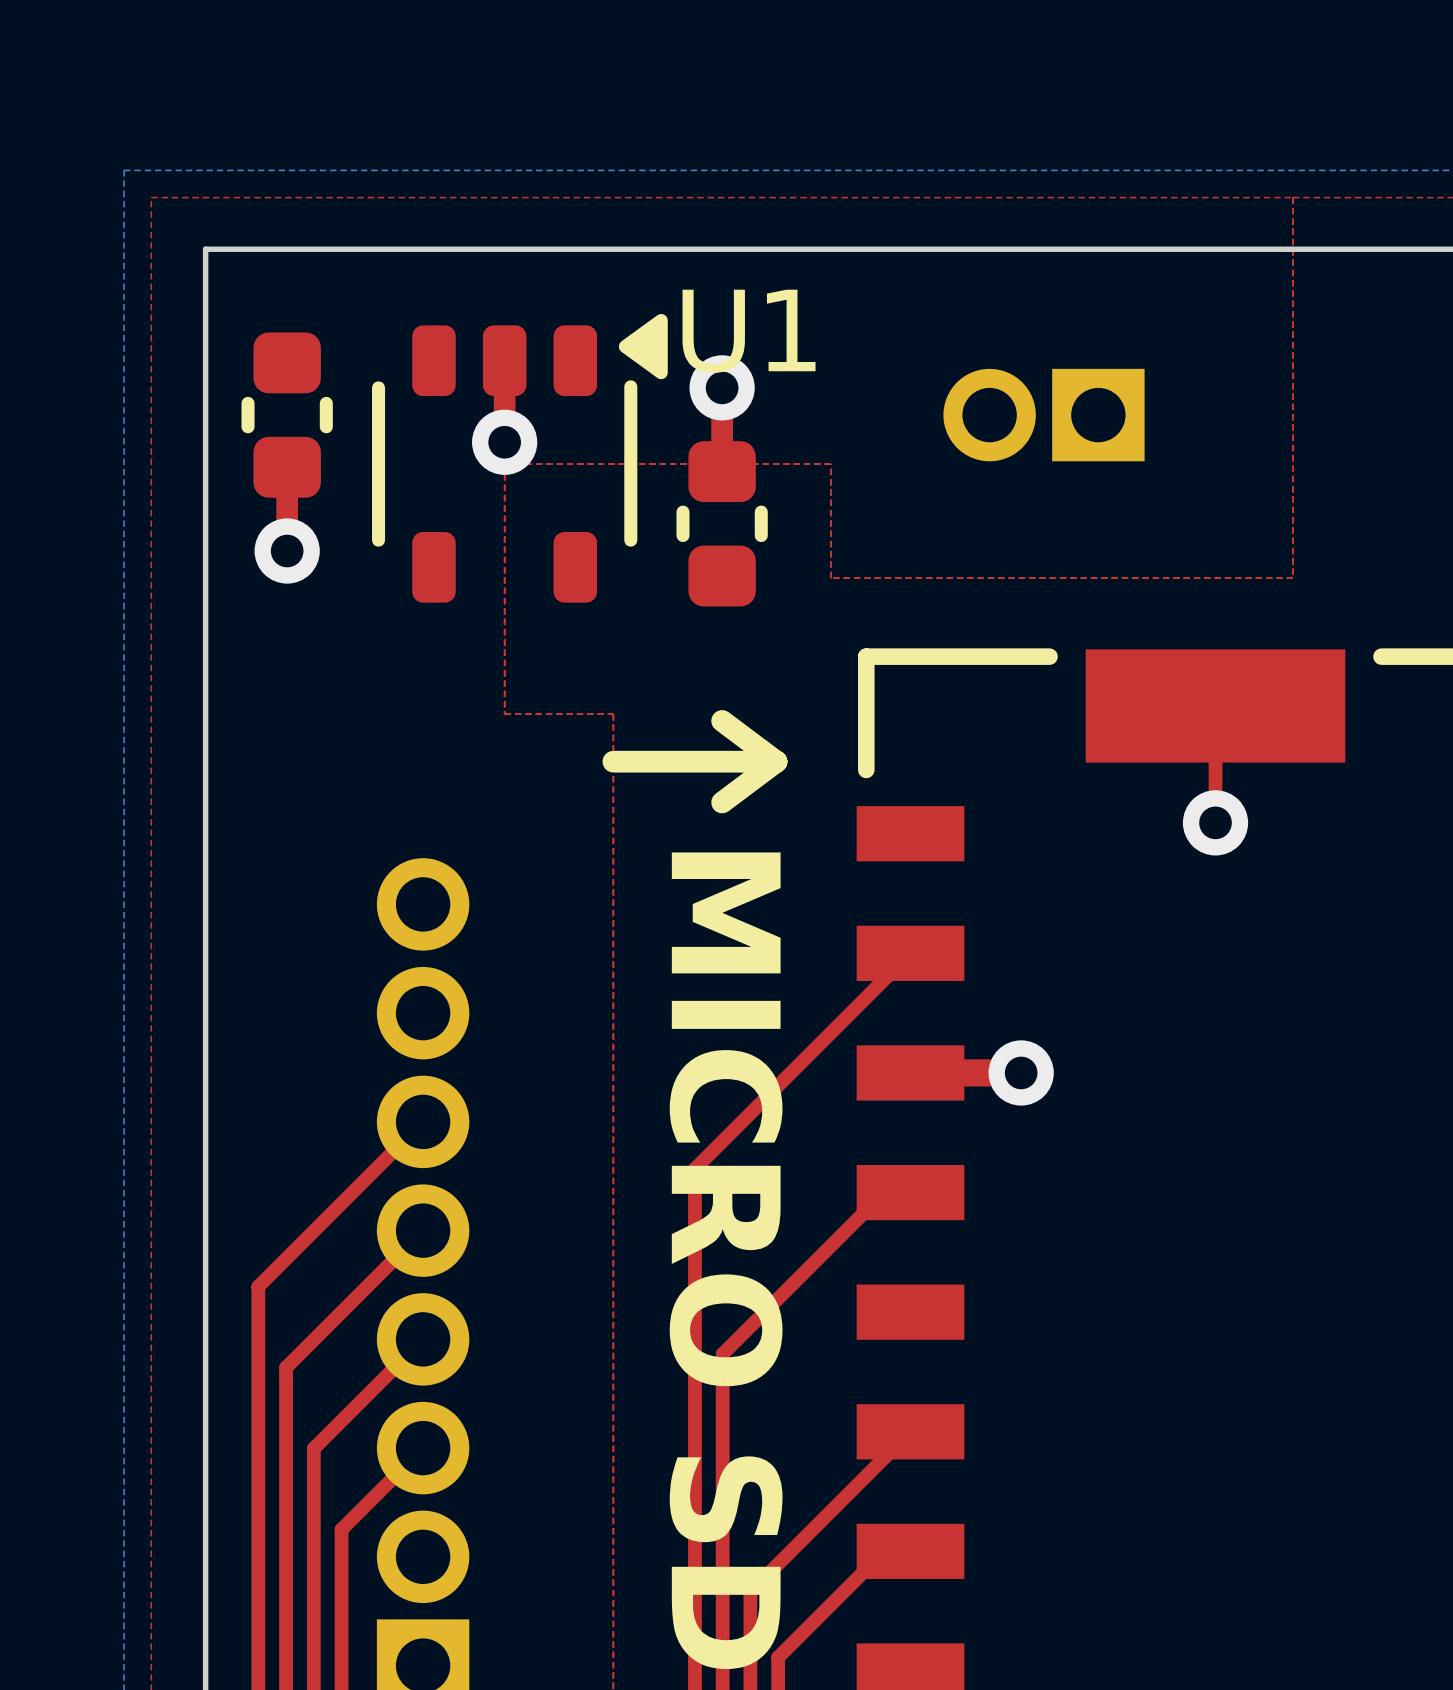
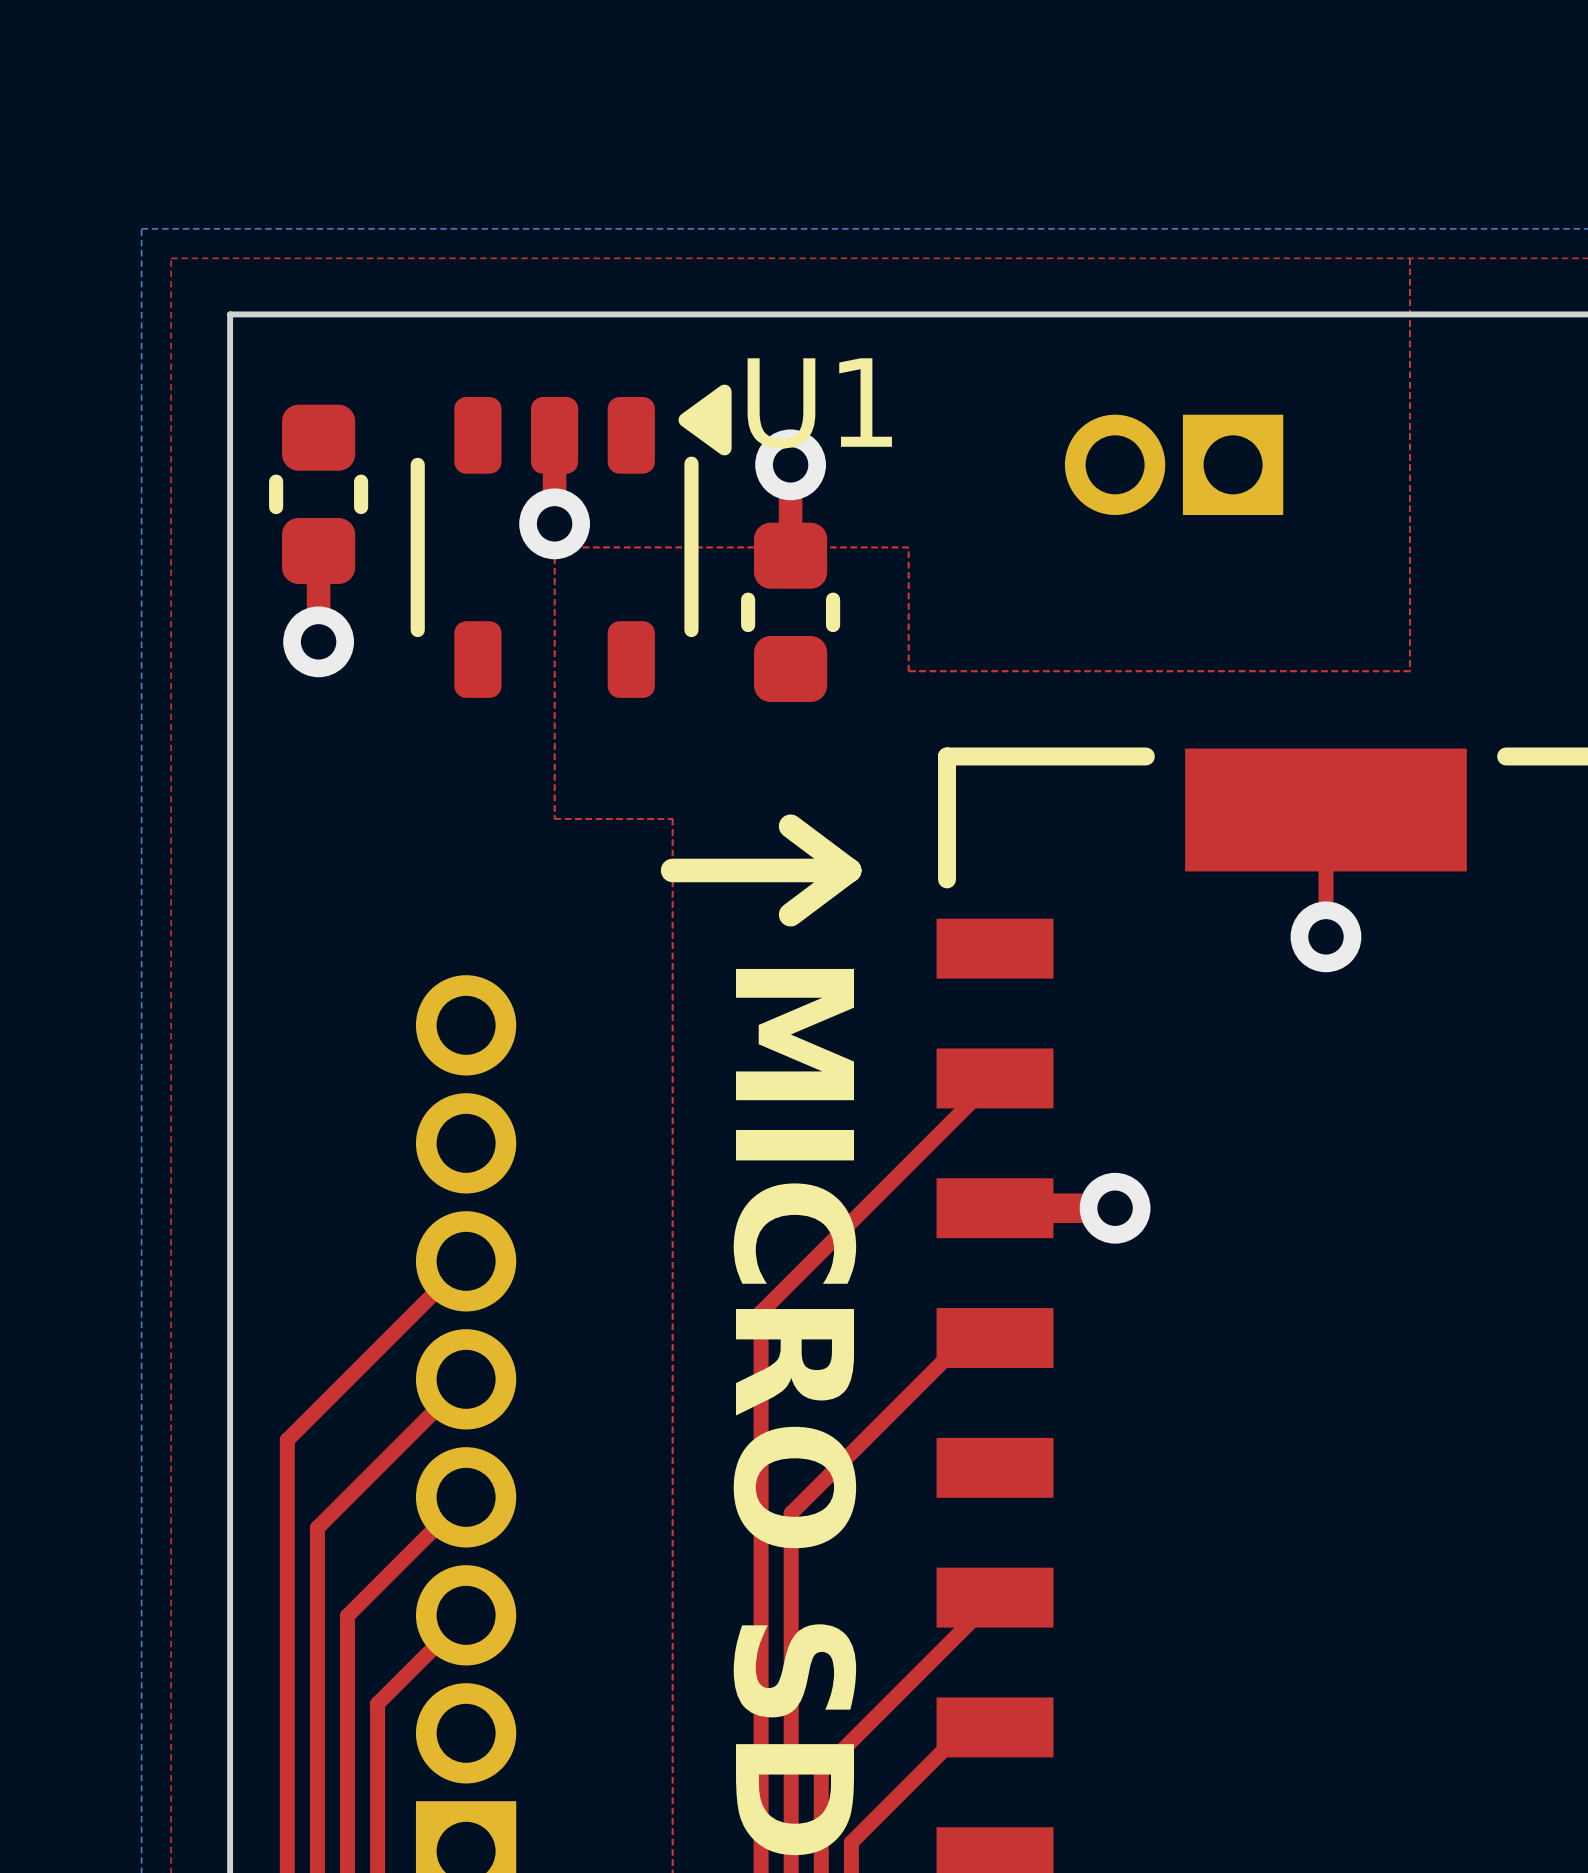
part position: (1044, 415) -> (1174, 464)

